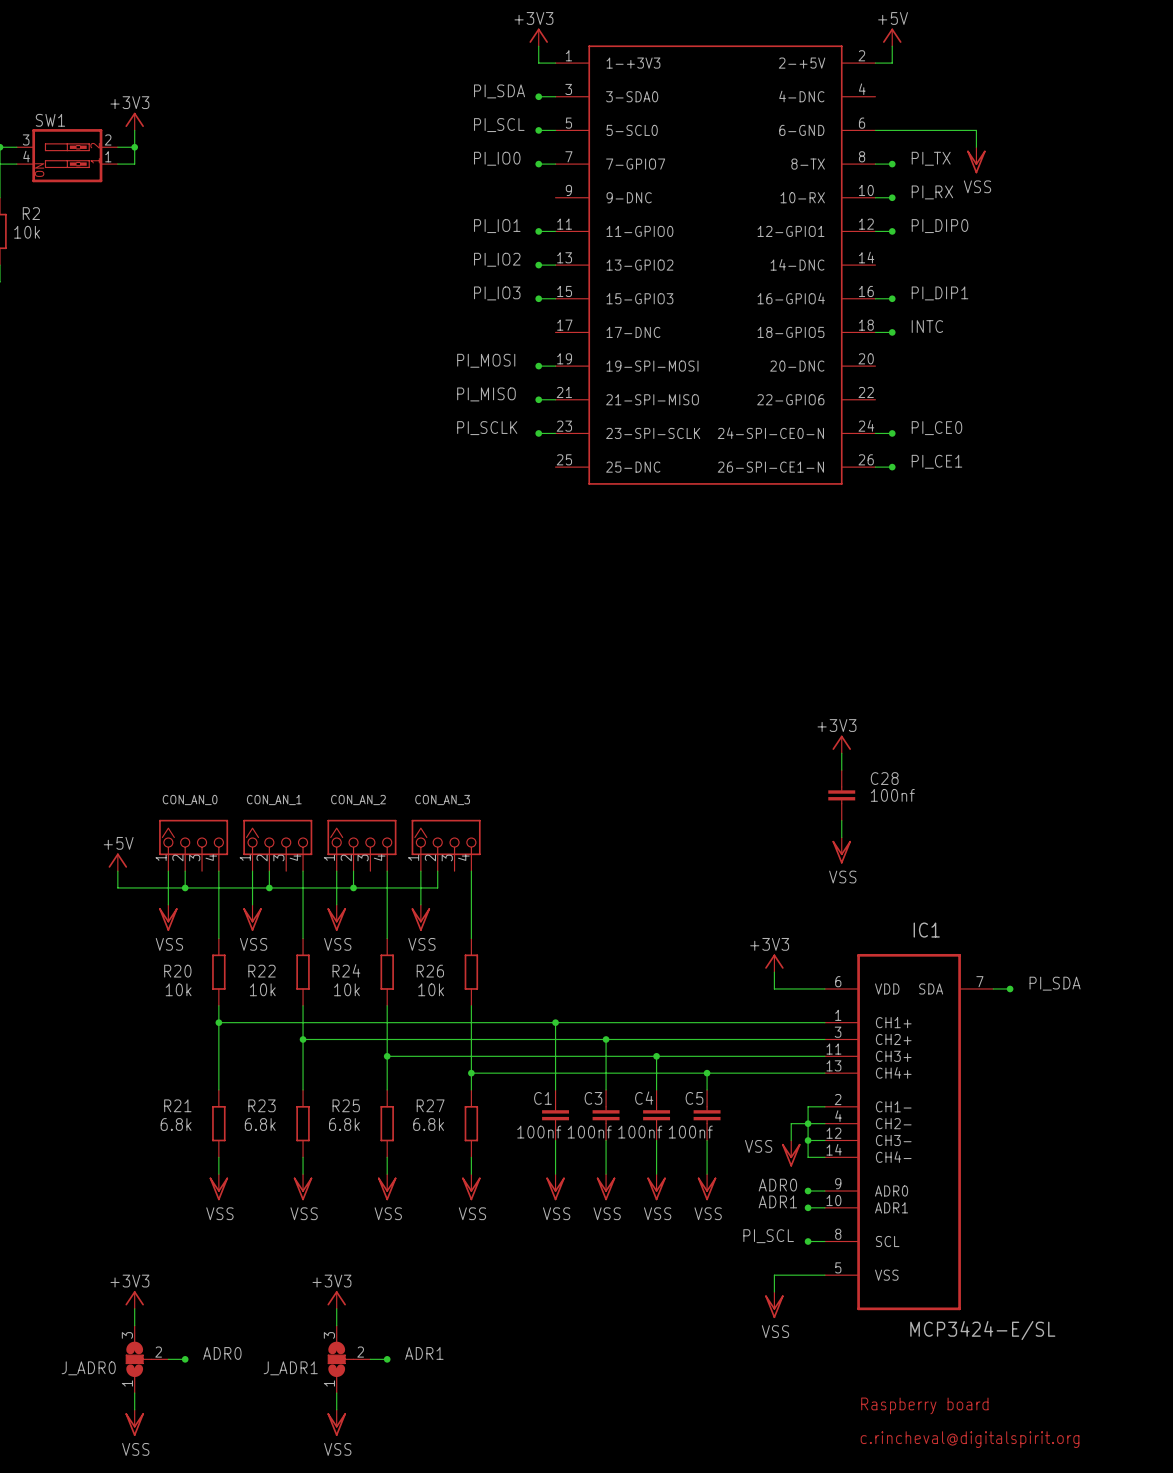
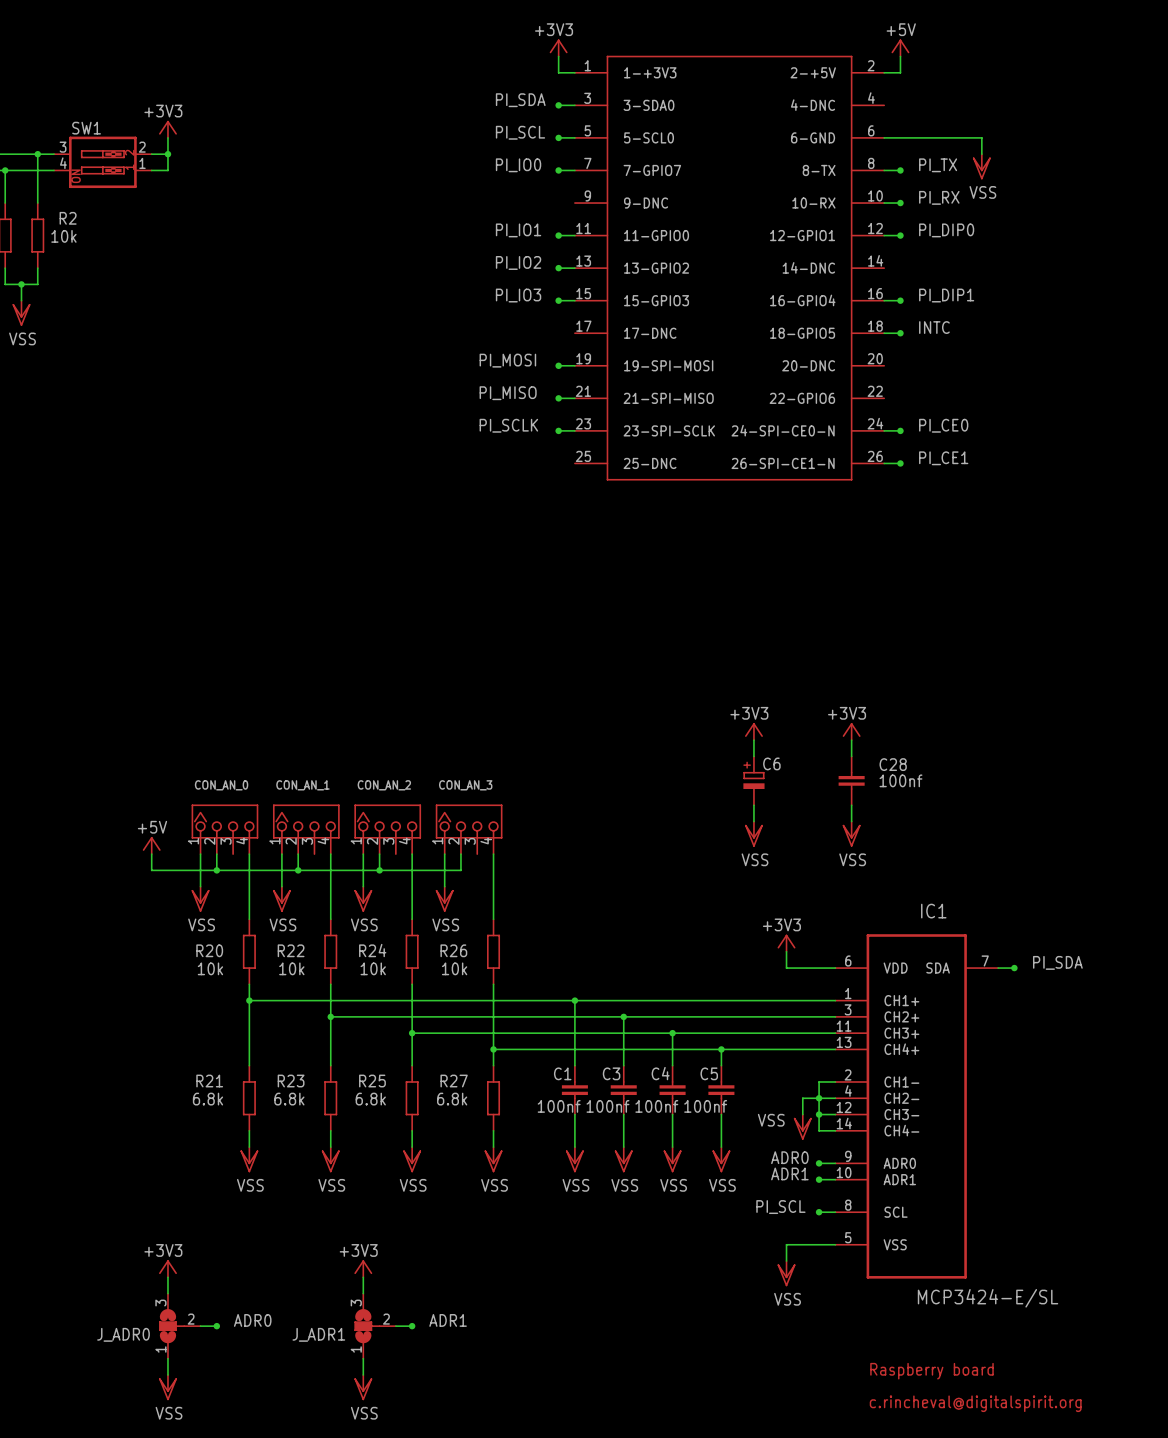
power symbol: none -> +3V3 (753, 731)
wire: none -> (753, 740) (753, 756)
C6: none -> (753, 780)
wire: none -> (753, 805) (753, 821)
power symbol: none -> VSS (753, 834)

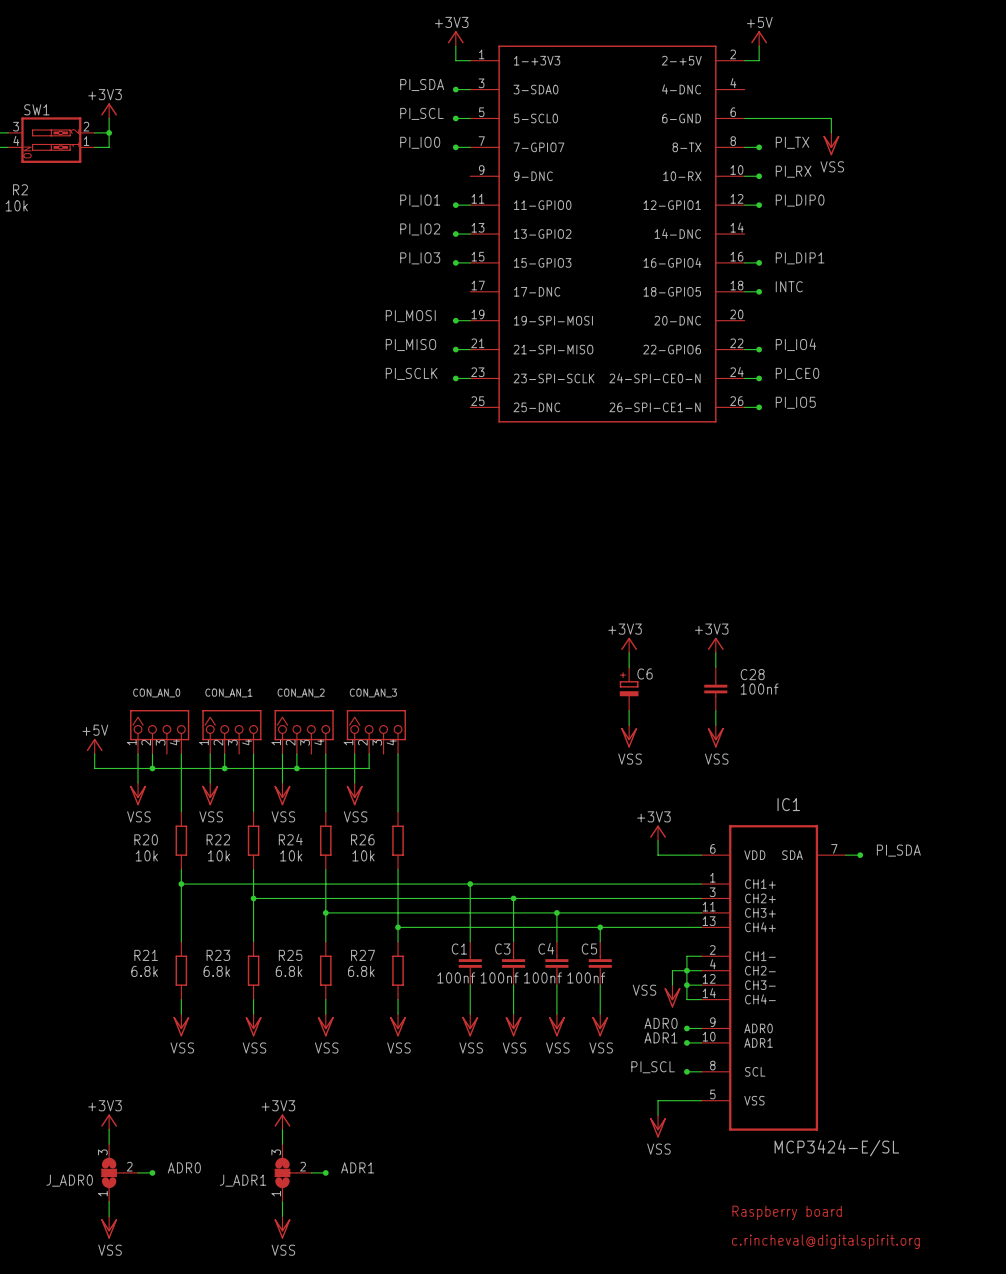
label: none -> PI_IO4 (796, 344)
wire: none -> (744, 349) (759, 349)
junction: none -> (759, 349)
label: PI_CE1 (943, 458) -> PI_IO5 (795, 402)

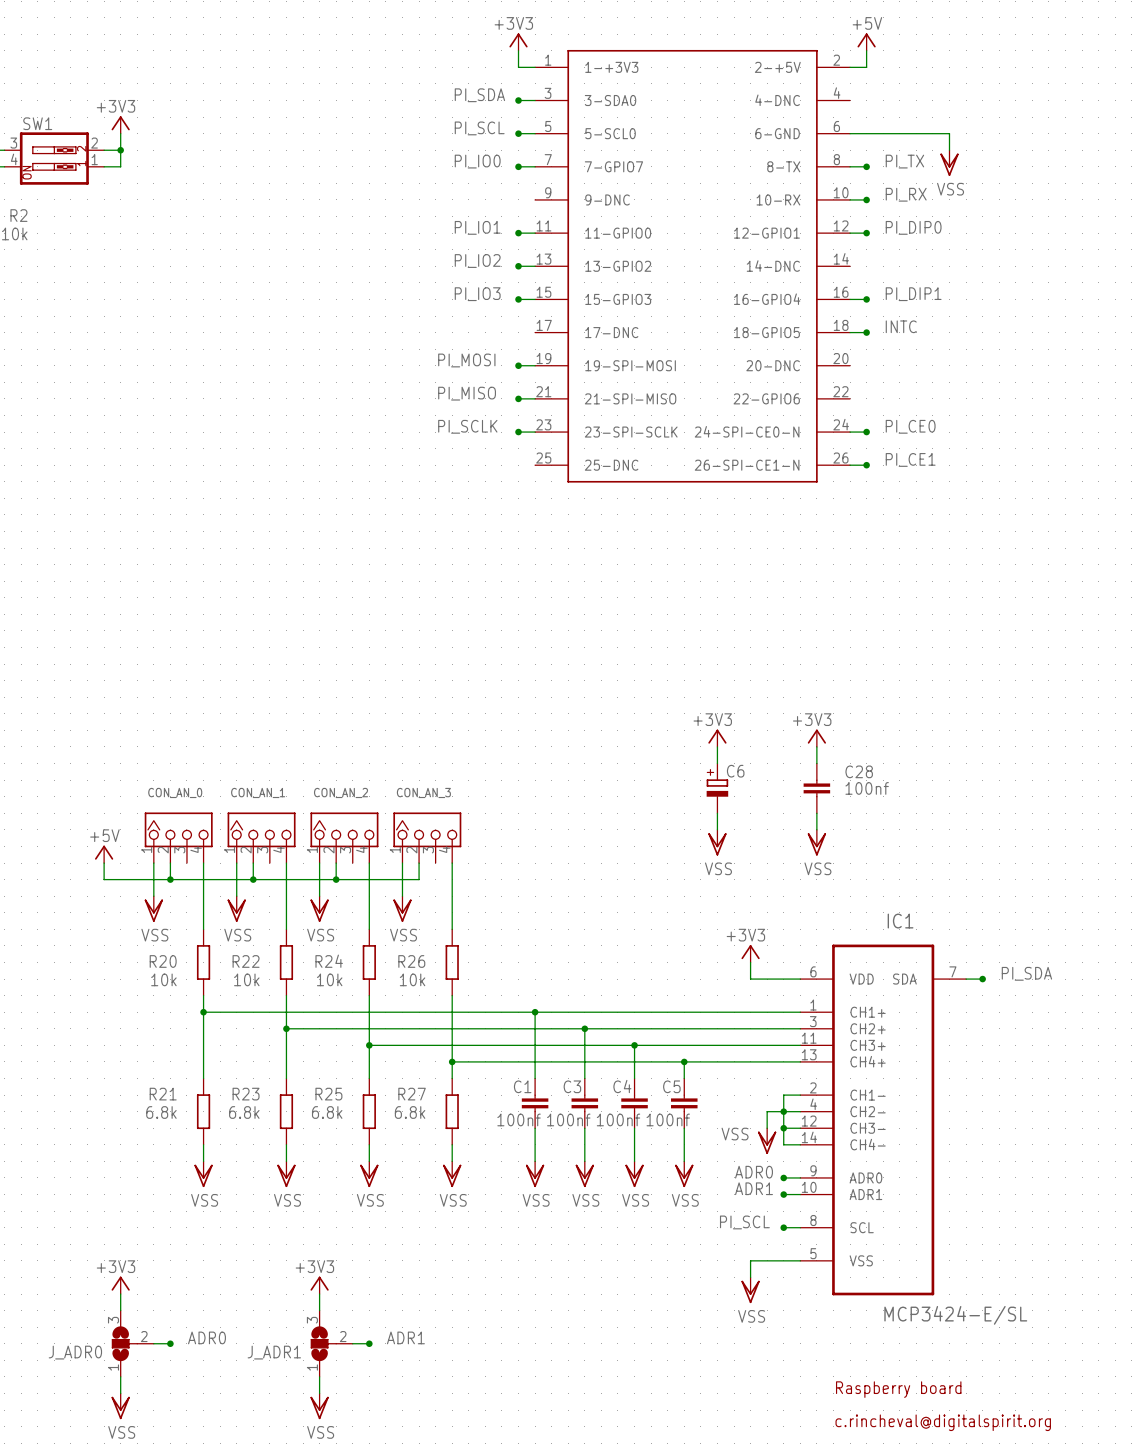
label: PI_IO4 (796, 344) -> none
wire: (744, 349) (759, 349) -> none
junction: (759, 349) -> none
label: PI_IO5 (795, 402) -> PI_CE1 (910, 459)

